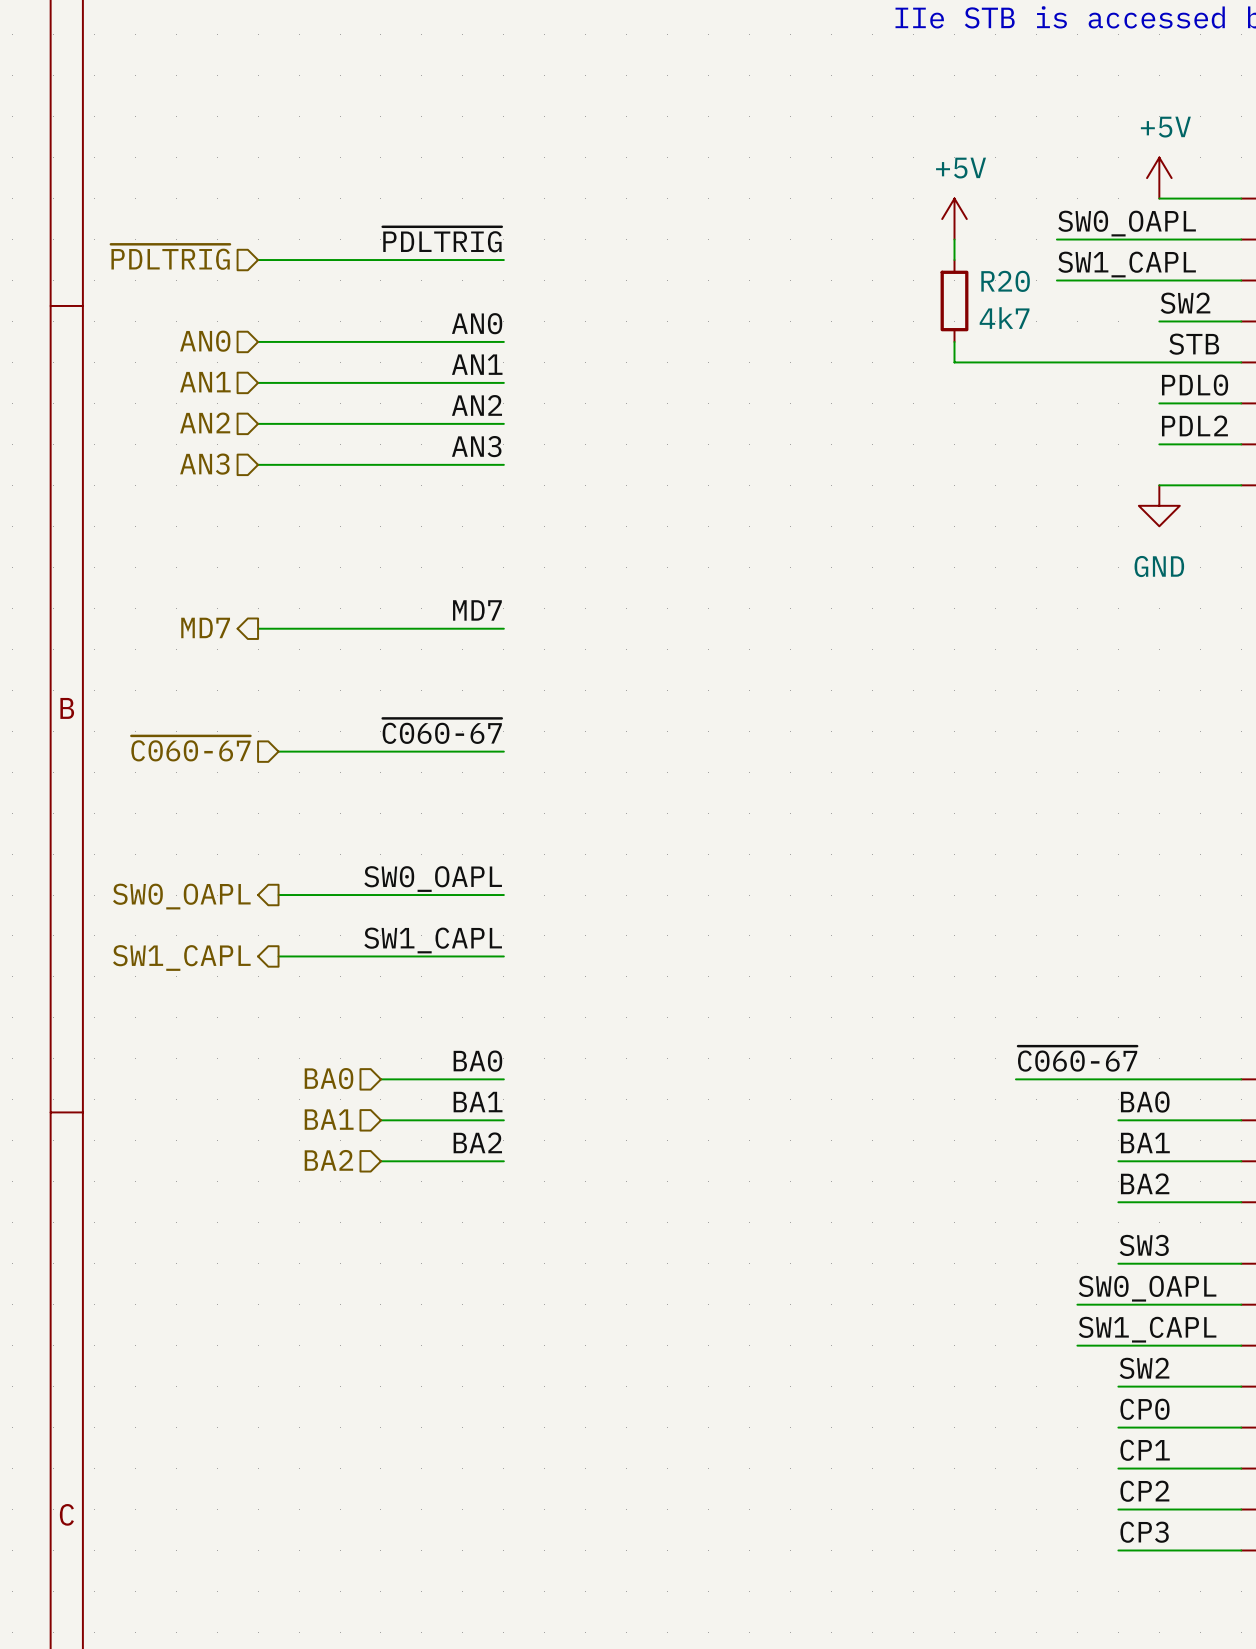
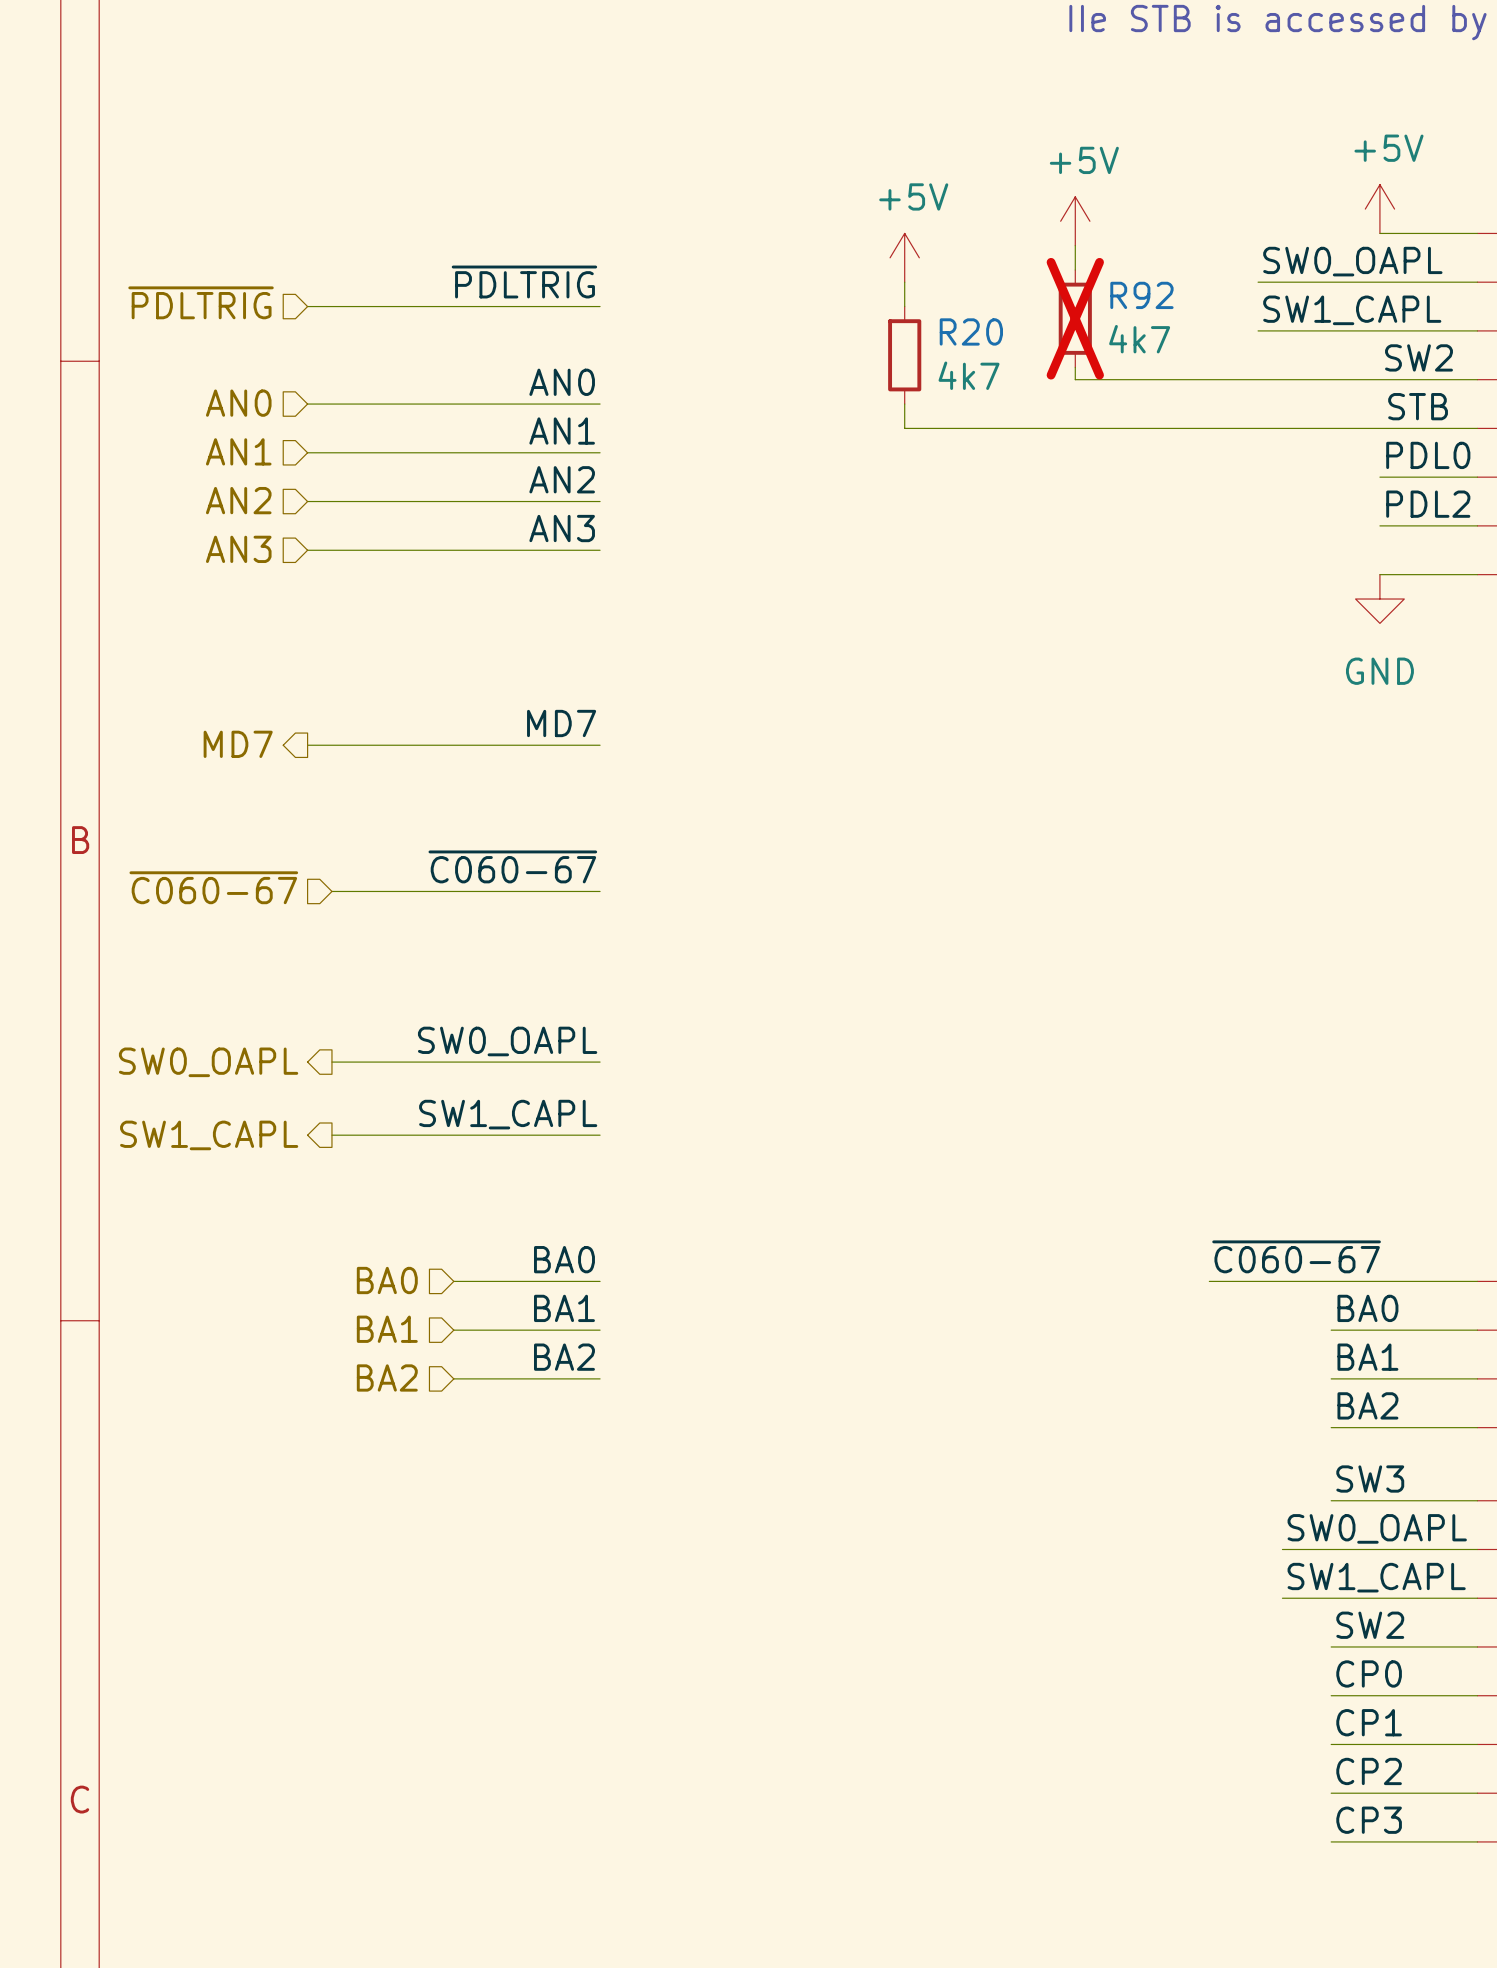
power symbol: none -> +5V (904, 257)
power symbol position: +5V (954, 219) -> +5V (1075, 221)
wire: none -> (904, 282) (904, 306)
wire: (954, 239) (954, 260) -> (1075, 245) (1075, 270)
R92: none -> 4k7 (1075, 318)
R20 position: (954, 300) -> (904, 355)
wire: none -> (1075, 367) (1075, 379) (1379, 379)
wire: (954, 341) (954, 362) -> (904, 404) (904, 428) (1136, 428)

